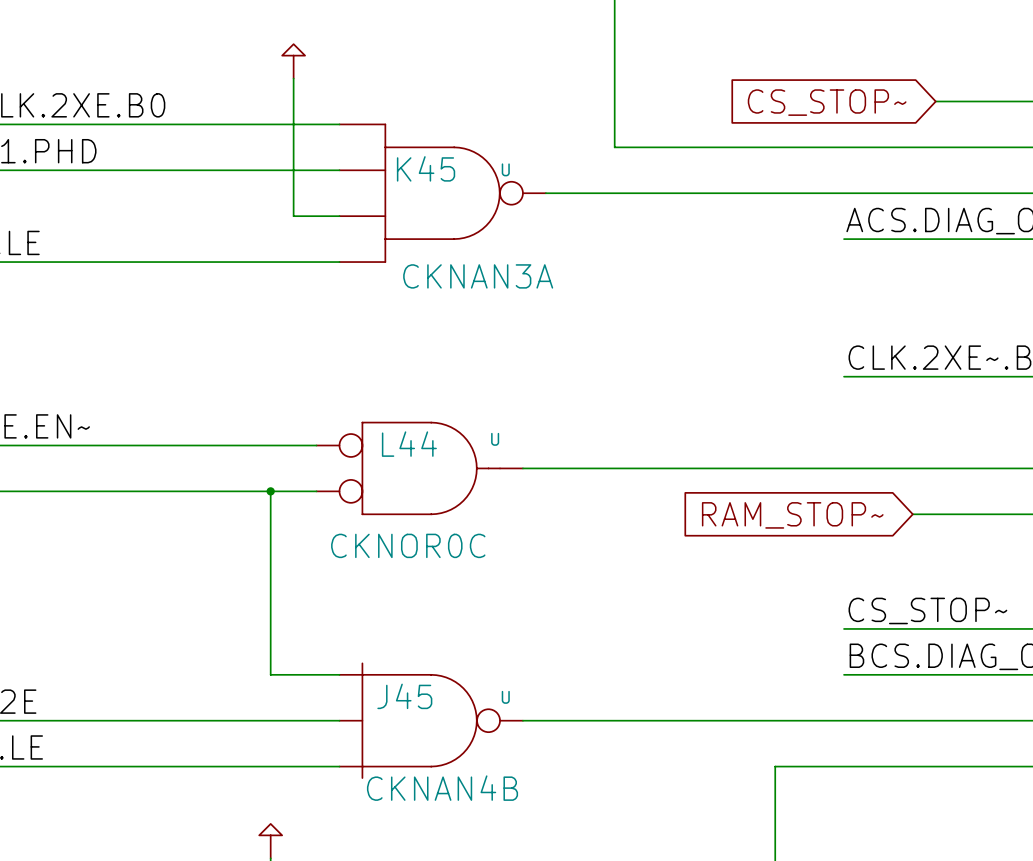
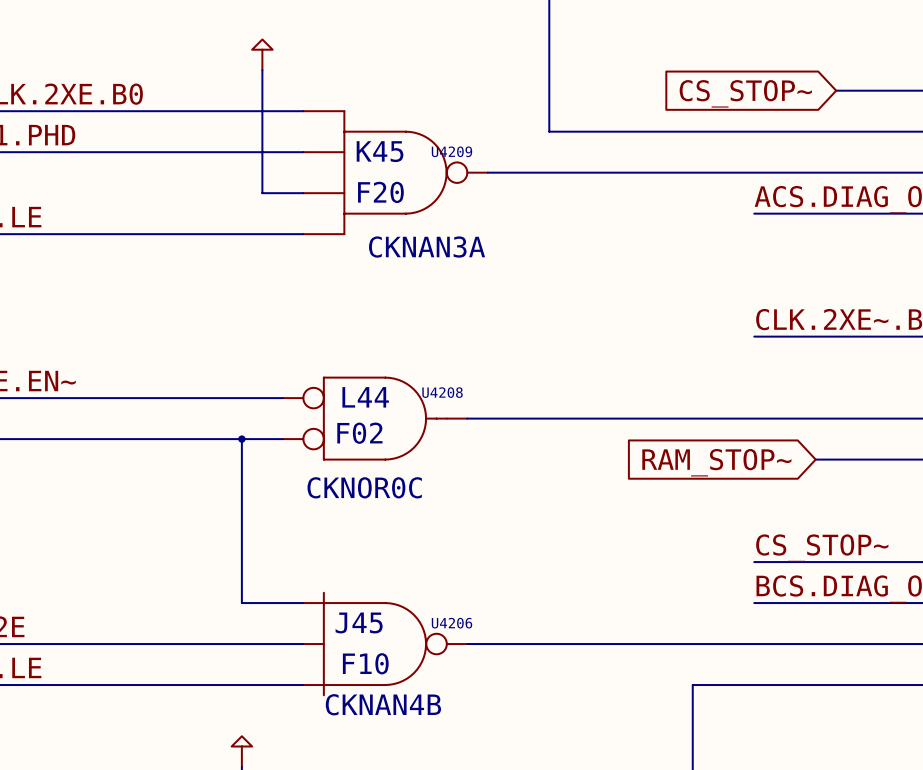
U name: U (505, 169) -> U4209 (451, 151)
U value: none -> F20 (380, 192)
U name: U (495, 439) -> U4208 (442, 392)
U value: none -> F02 (359, 433)
U name: U (505, 697) -> U4206 (452, 623)
U value: none -> F10 (365, 663)

